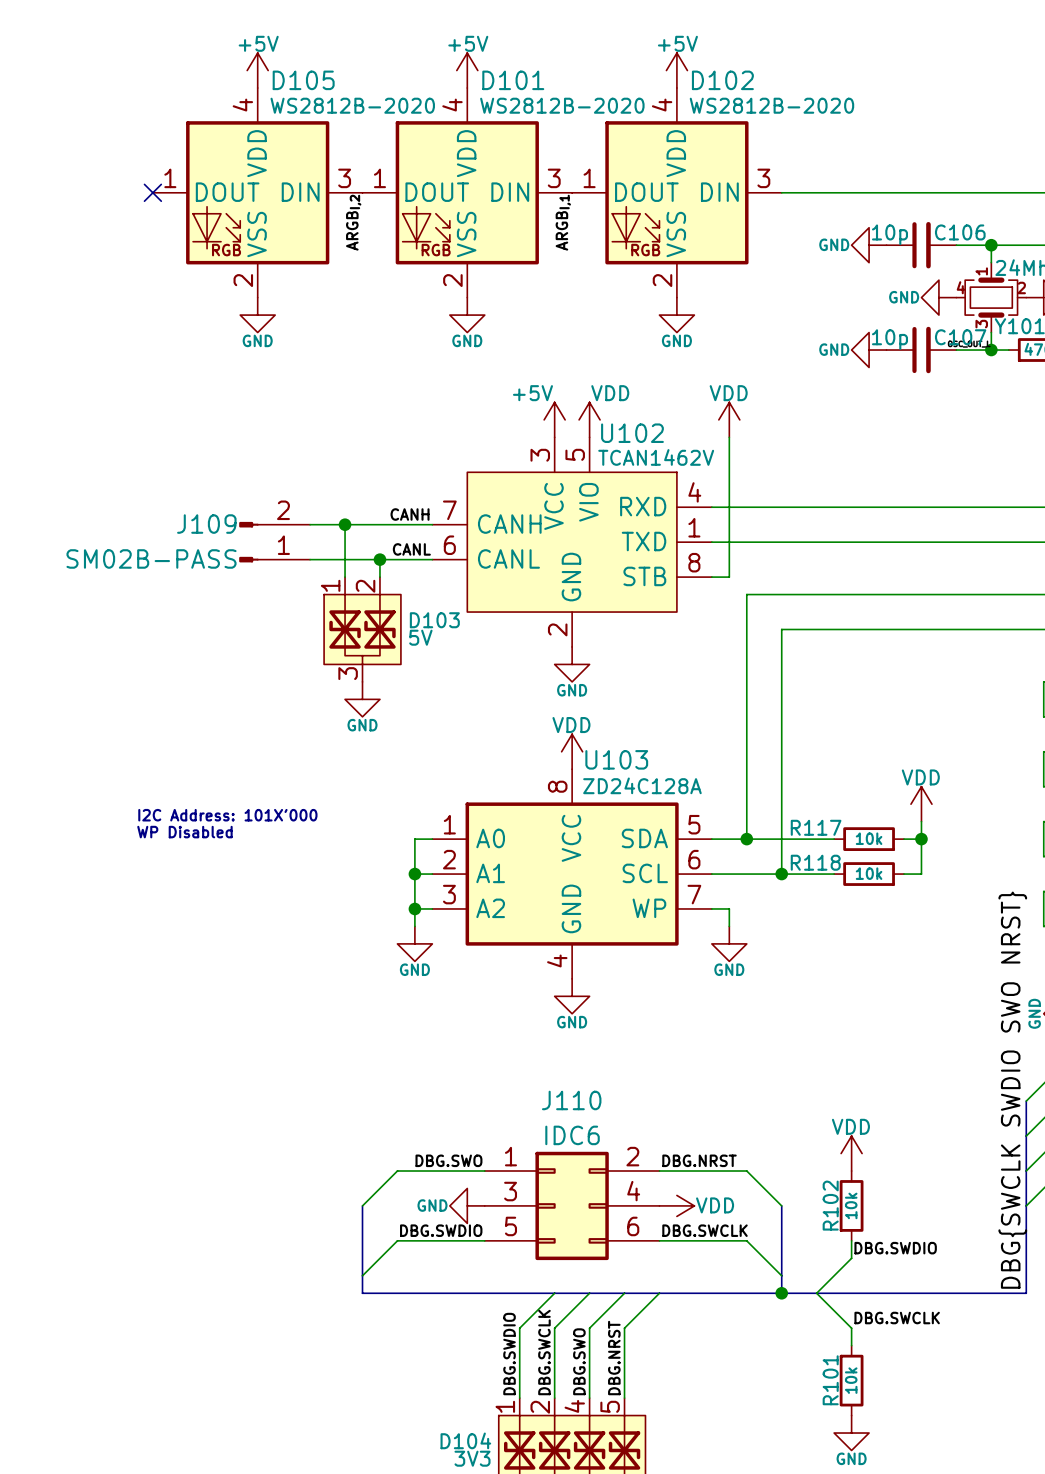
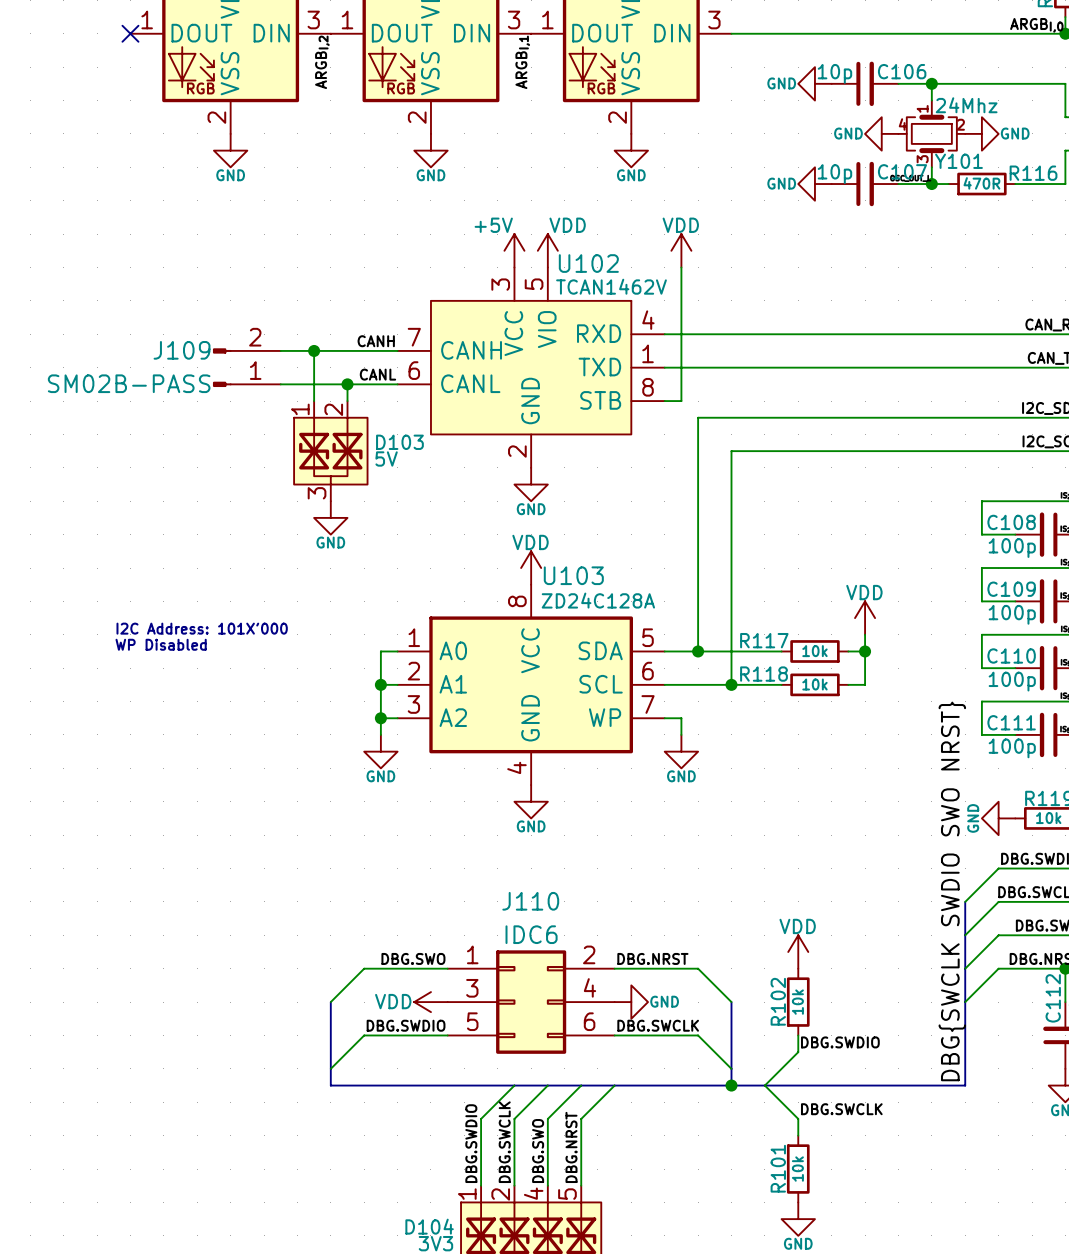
power symbol: GND (467, 1205) -> VDD (430, 1002)
power symbol: VDD (676, 1205) -> GND (631, 1002)

